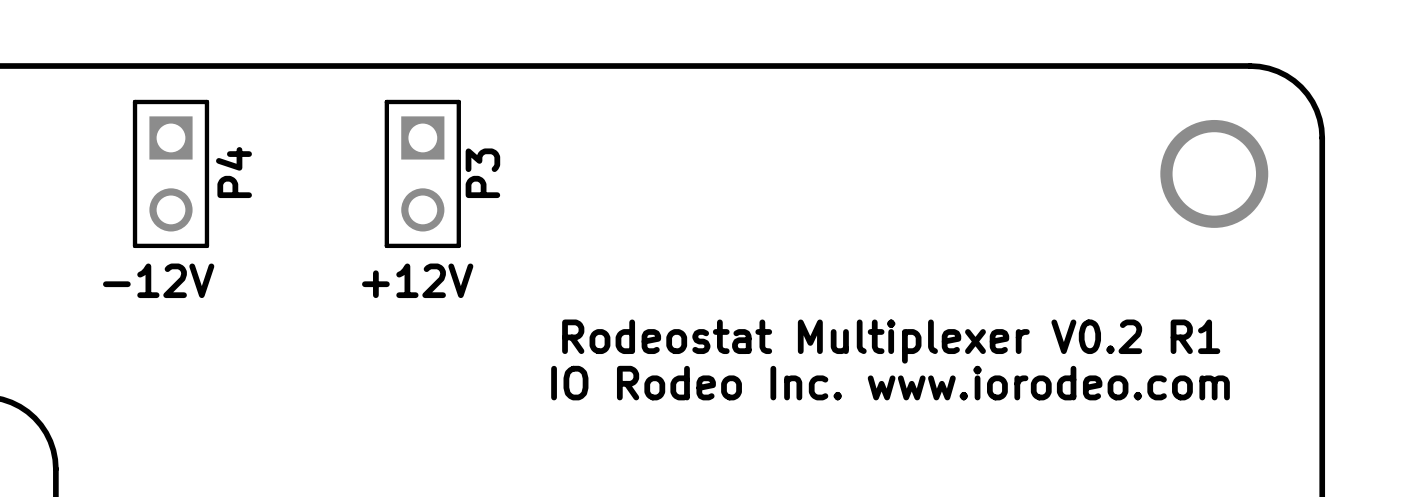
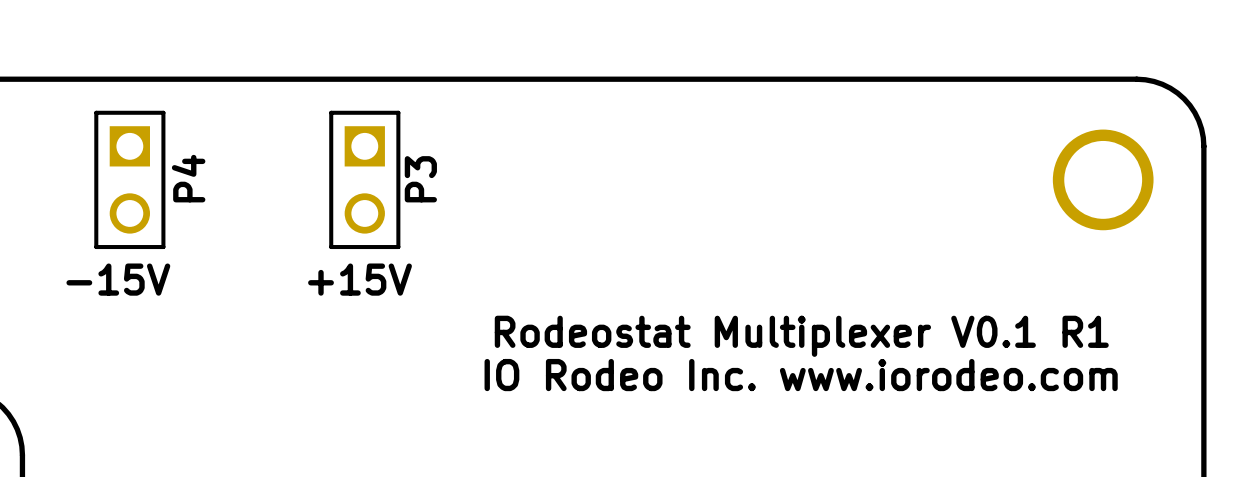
text: -12V (158, 280) -> -15V (118, 279)
text: +12V (417, 280) -> +15V (360, 279)
text: Rodeostat Multiplexer V0.2 R1 (891, 341) -> Rodeostat Multiplexer V0.1 R1 (801, 336)

